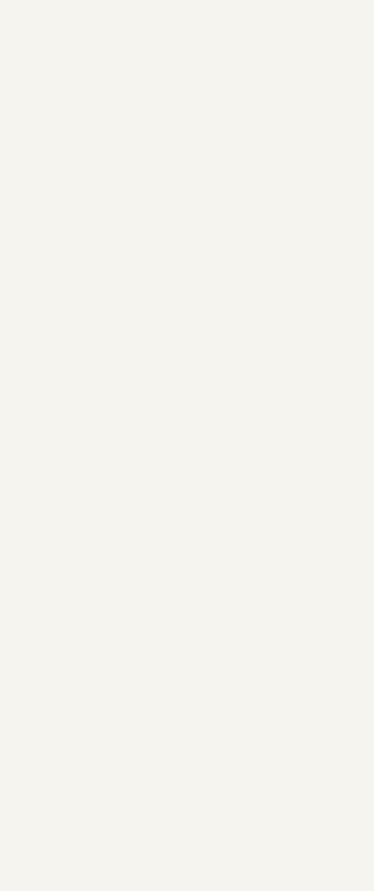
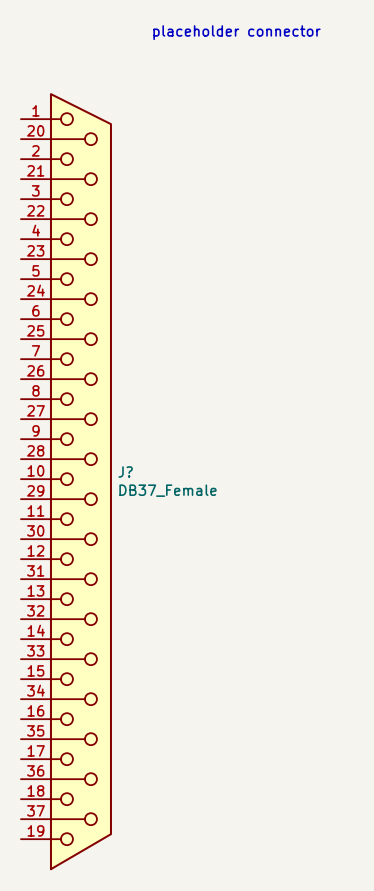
text: none -> placeholder connector (237, 32)
J?: none -> DB37_Female (66, 481)

